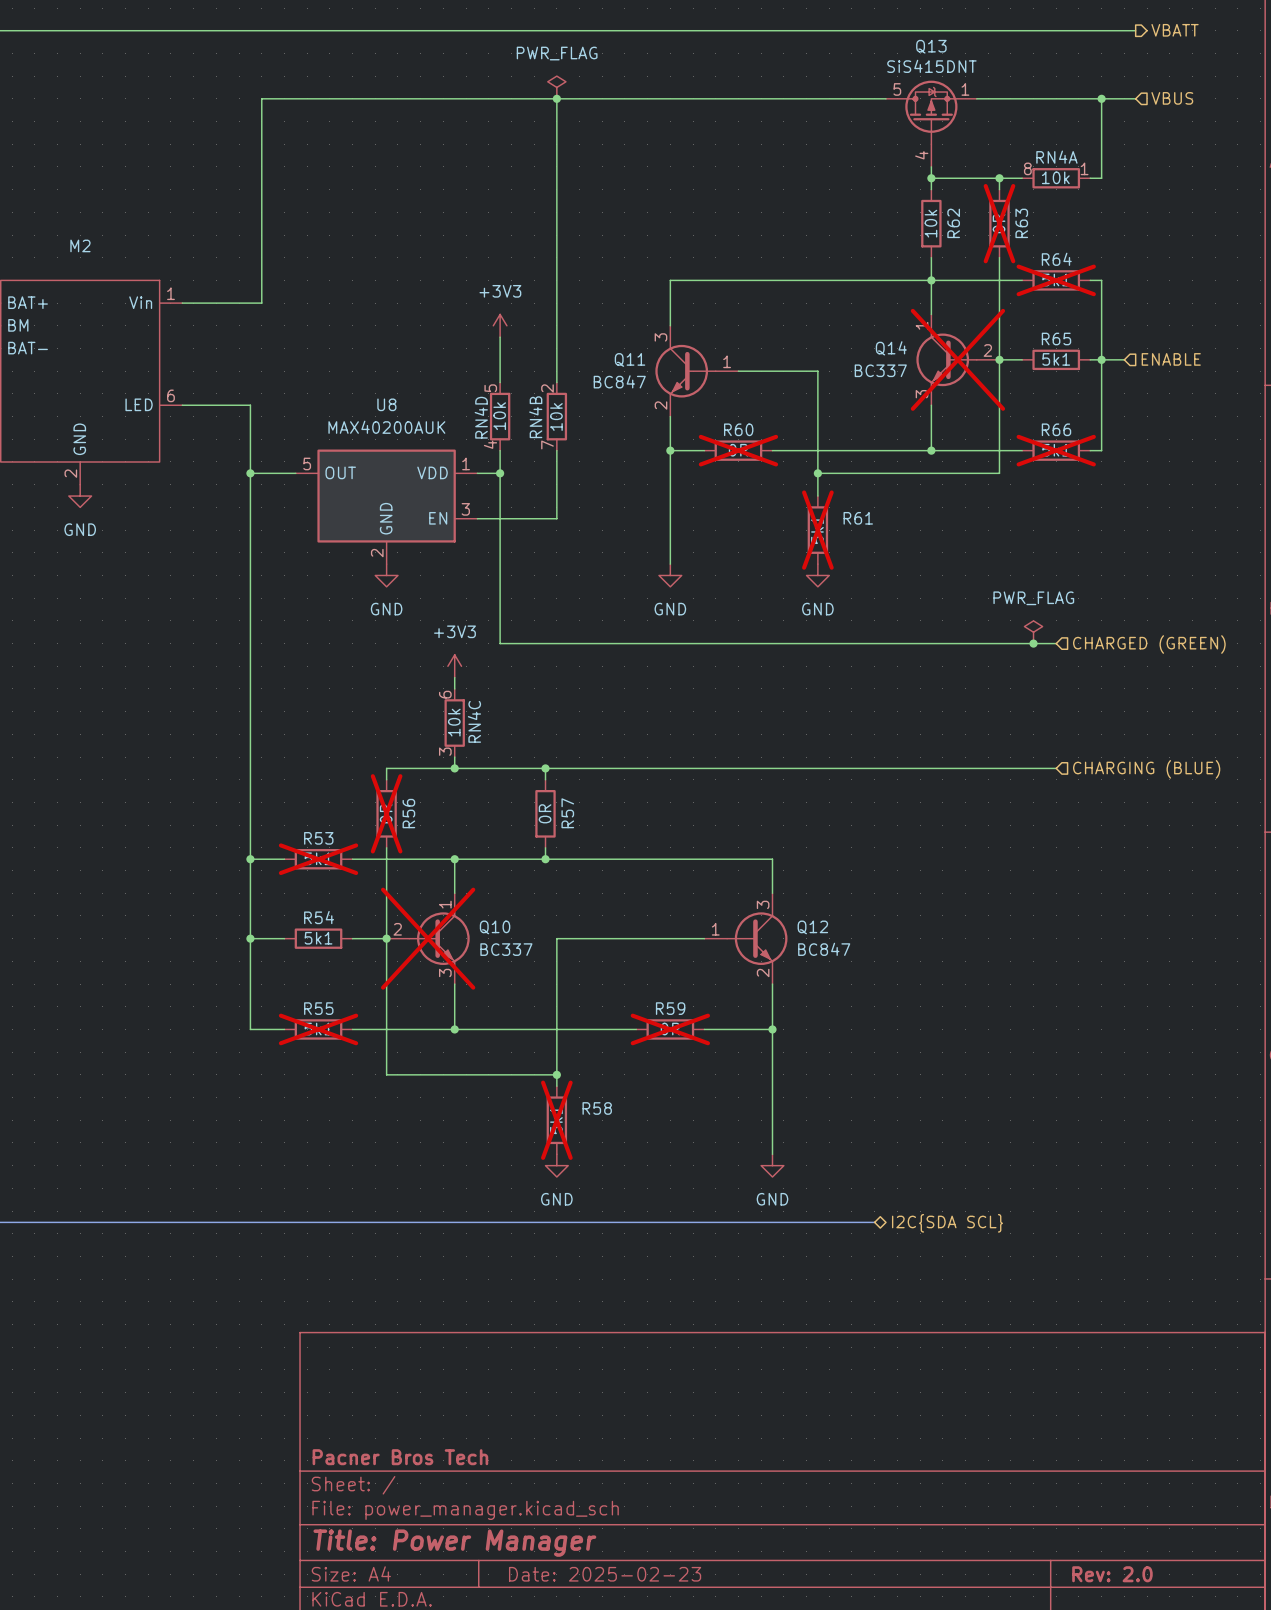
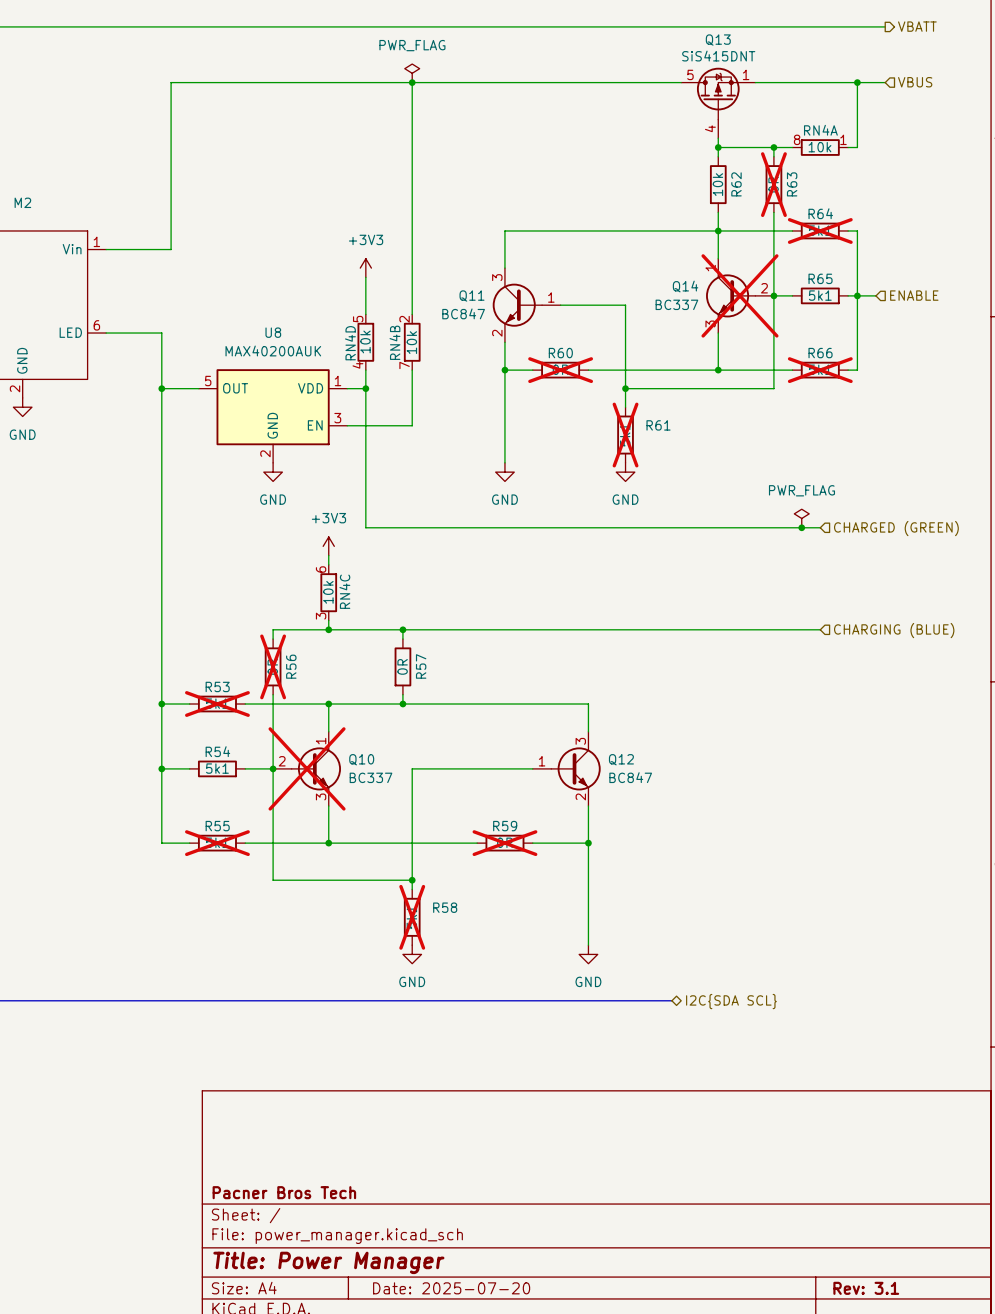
title block: Date: 2025-02-23 (605, 1574) -> Date: 2025-07-20 (451, 1288)
title block: Rev: 2.0 (1112, 1574) -> Rev: 3.1 (866, 1288)

